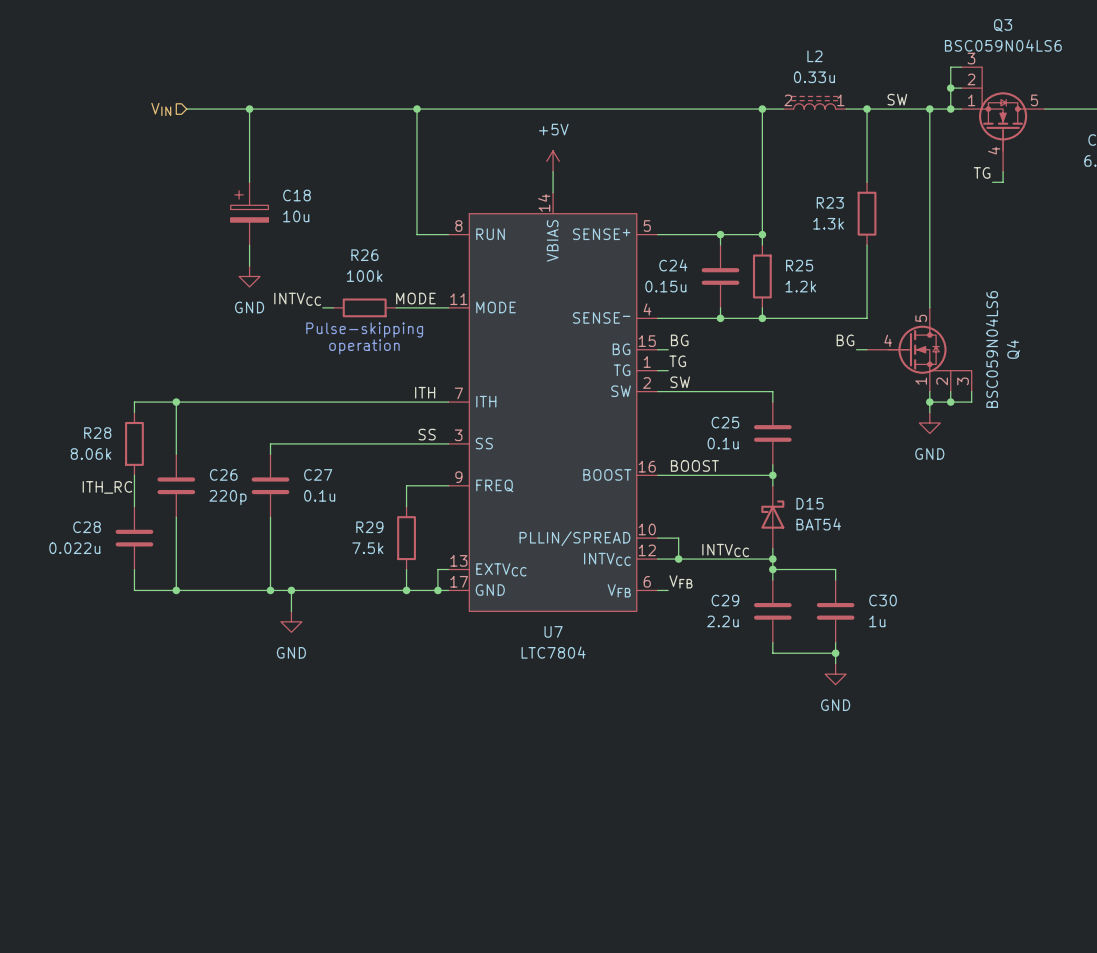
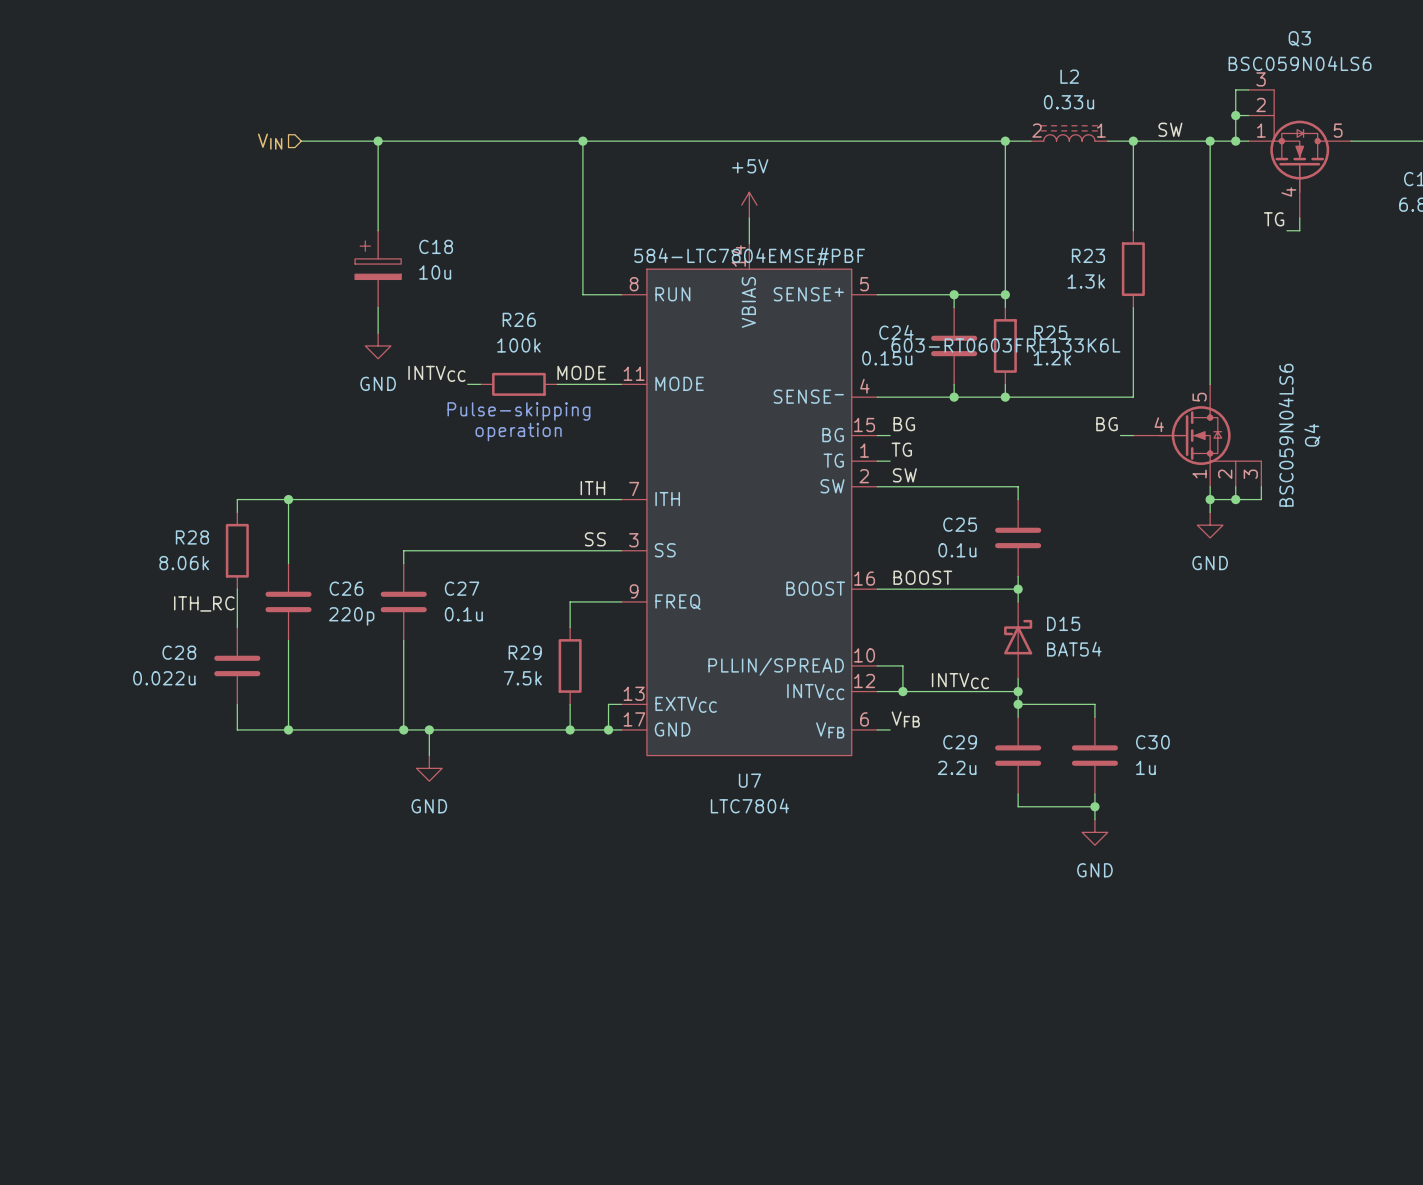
U7 text: none -> 584-LTC7804EMSE#PBF (749, 256)
R25 text: none -> 603-RT0603FRE133K6L (1005, 345)

